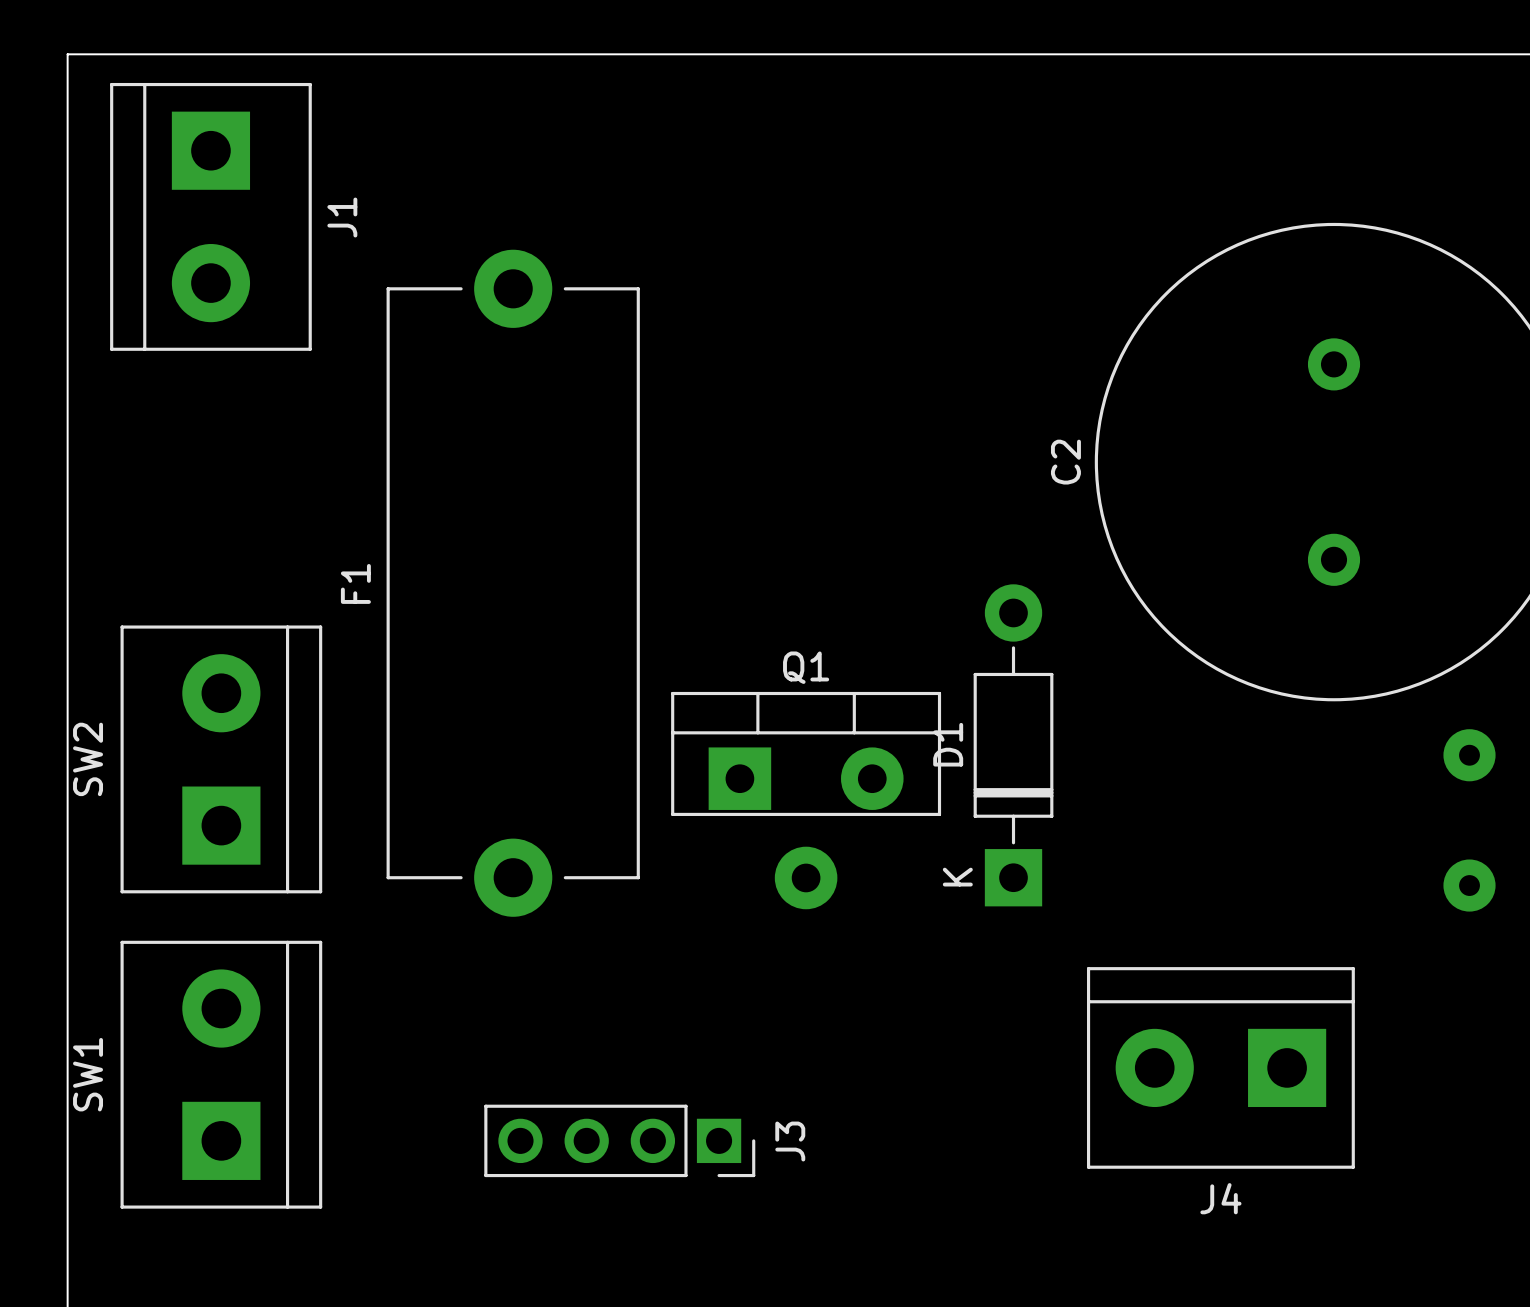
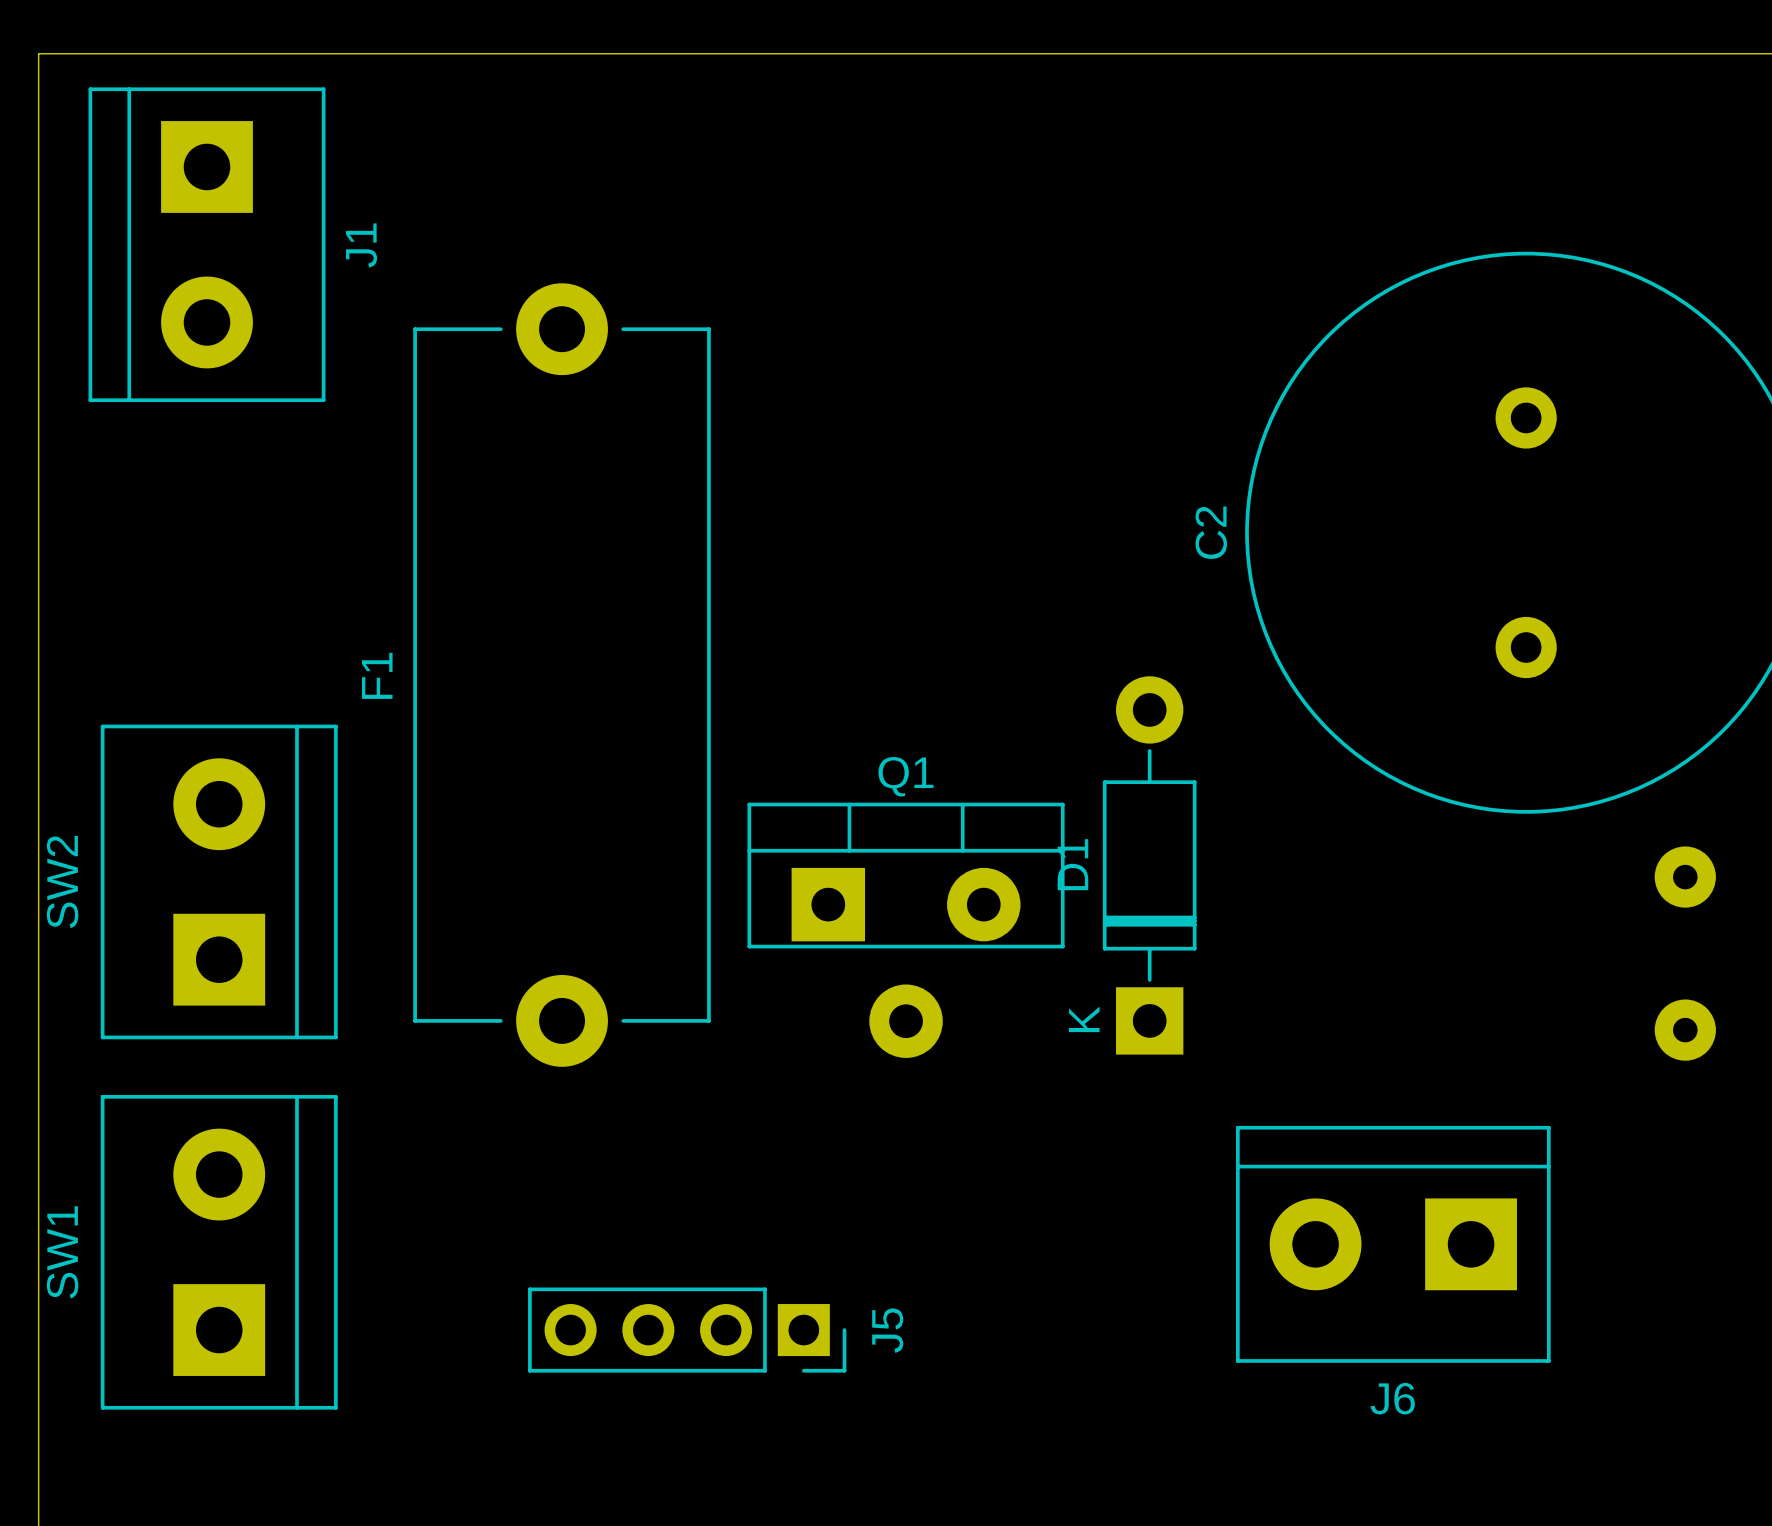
J3 name: J3 (790, 1141) -> J5 (887, 1330)
J4 name: J4 (1220, 1198) -> J6 (1392, 1398)

